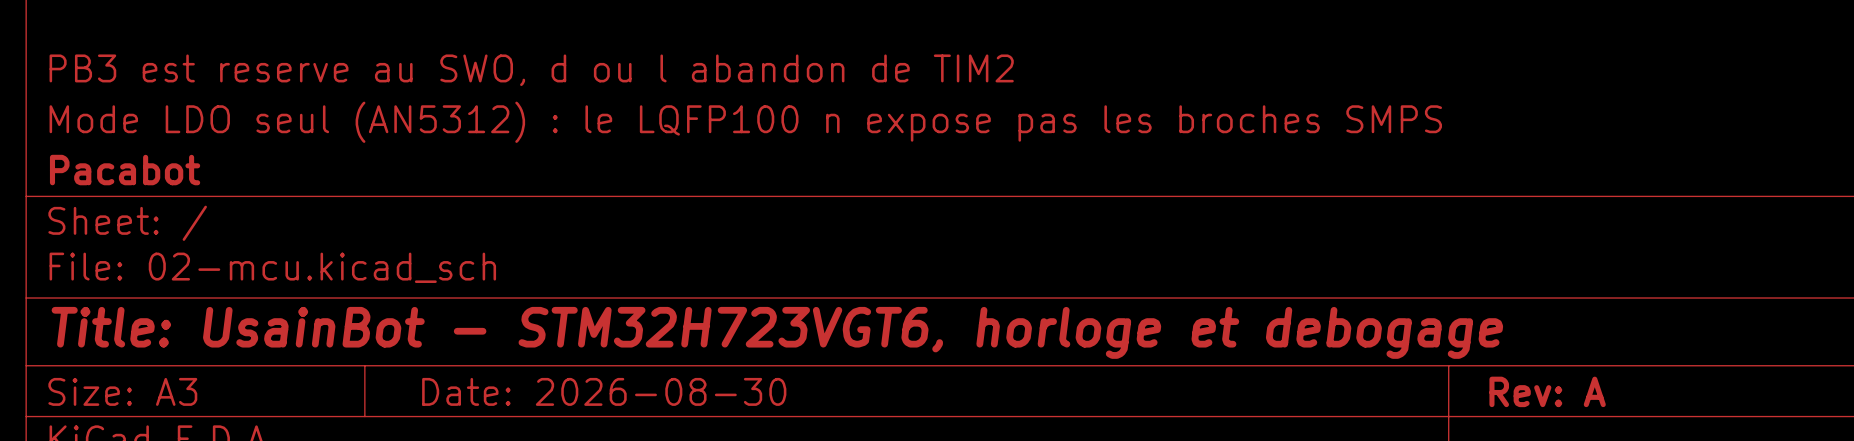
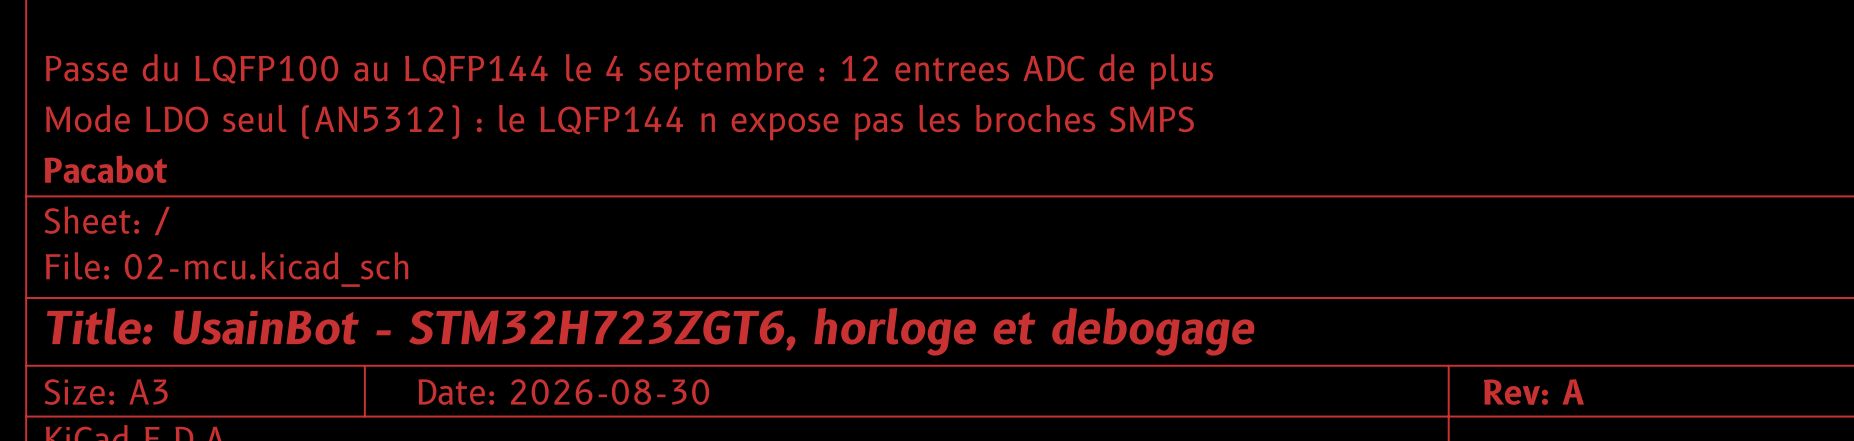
title block: PB3 est reserve au SWO, d ou l abandon de TIM2 (531, 70) -> Passe du LQFP100 au LQFP144 le 4 septembre : 12 entrees ADC de plus (629, 71)
title block: Mode LDO seul (AN5312) : le LQFP100 n expose pas les broches SMPS (745, 122) -> Mode LDO seul (AN5312) : le LQFP144 n expose pas les broches SMPS (619, 122)
title block: Title: UsainBot - STM32H723VGT6, horloge et debogage (777, 332) -> Title: UsainBot - STM32H723ZGT6, horloge et debogage (650, 331)

